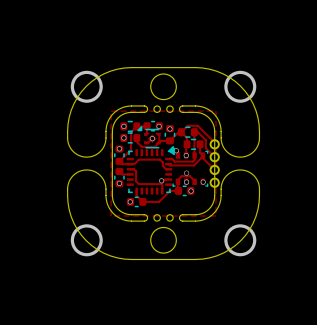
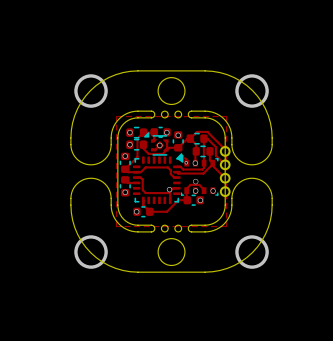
via: (176, 150) -> none
via: none -> (186, 162)

